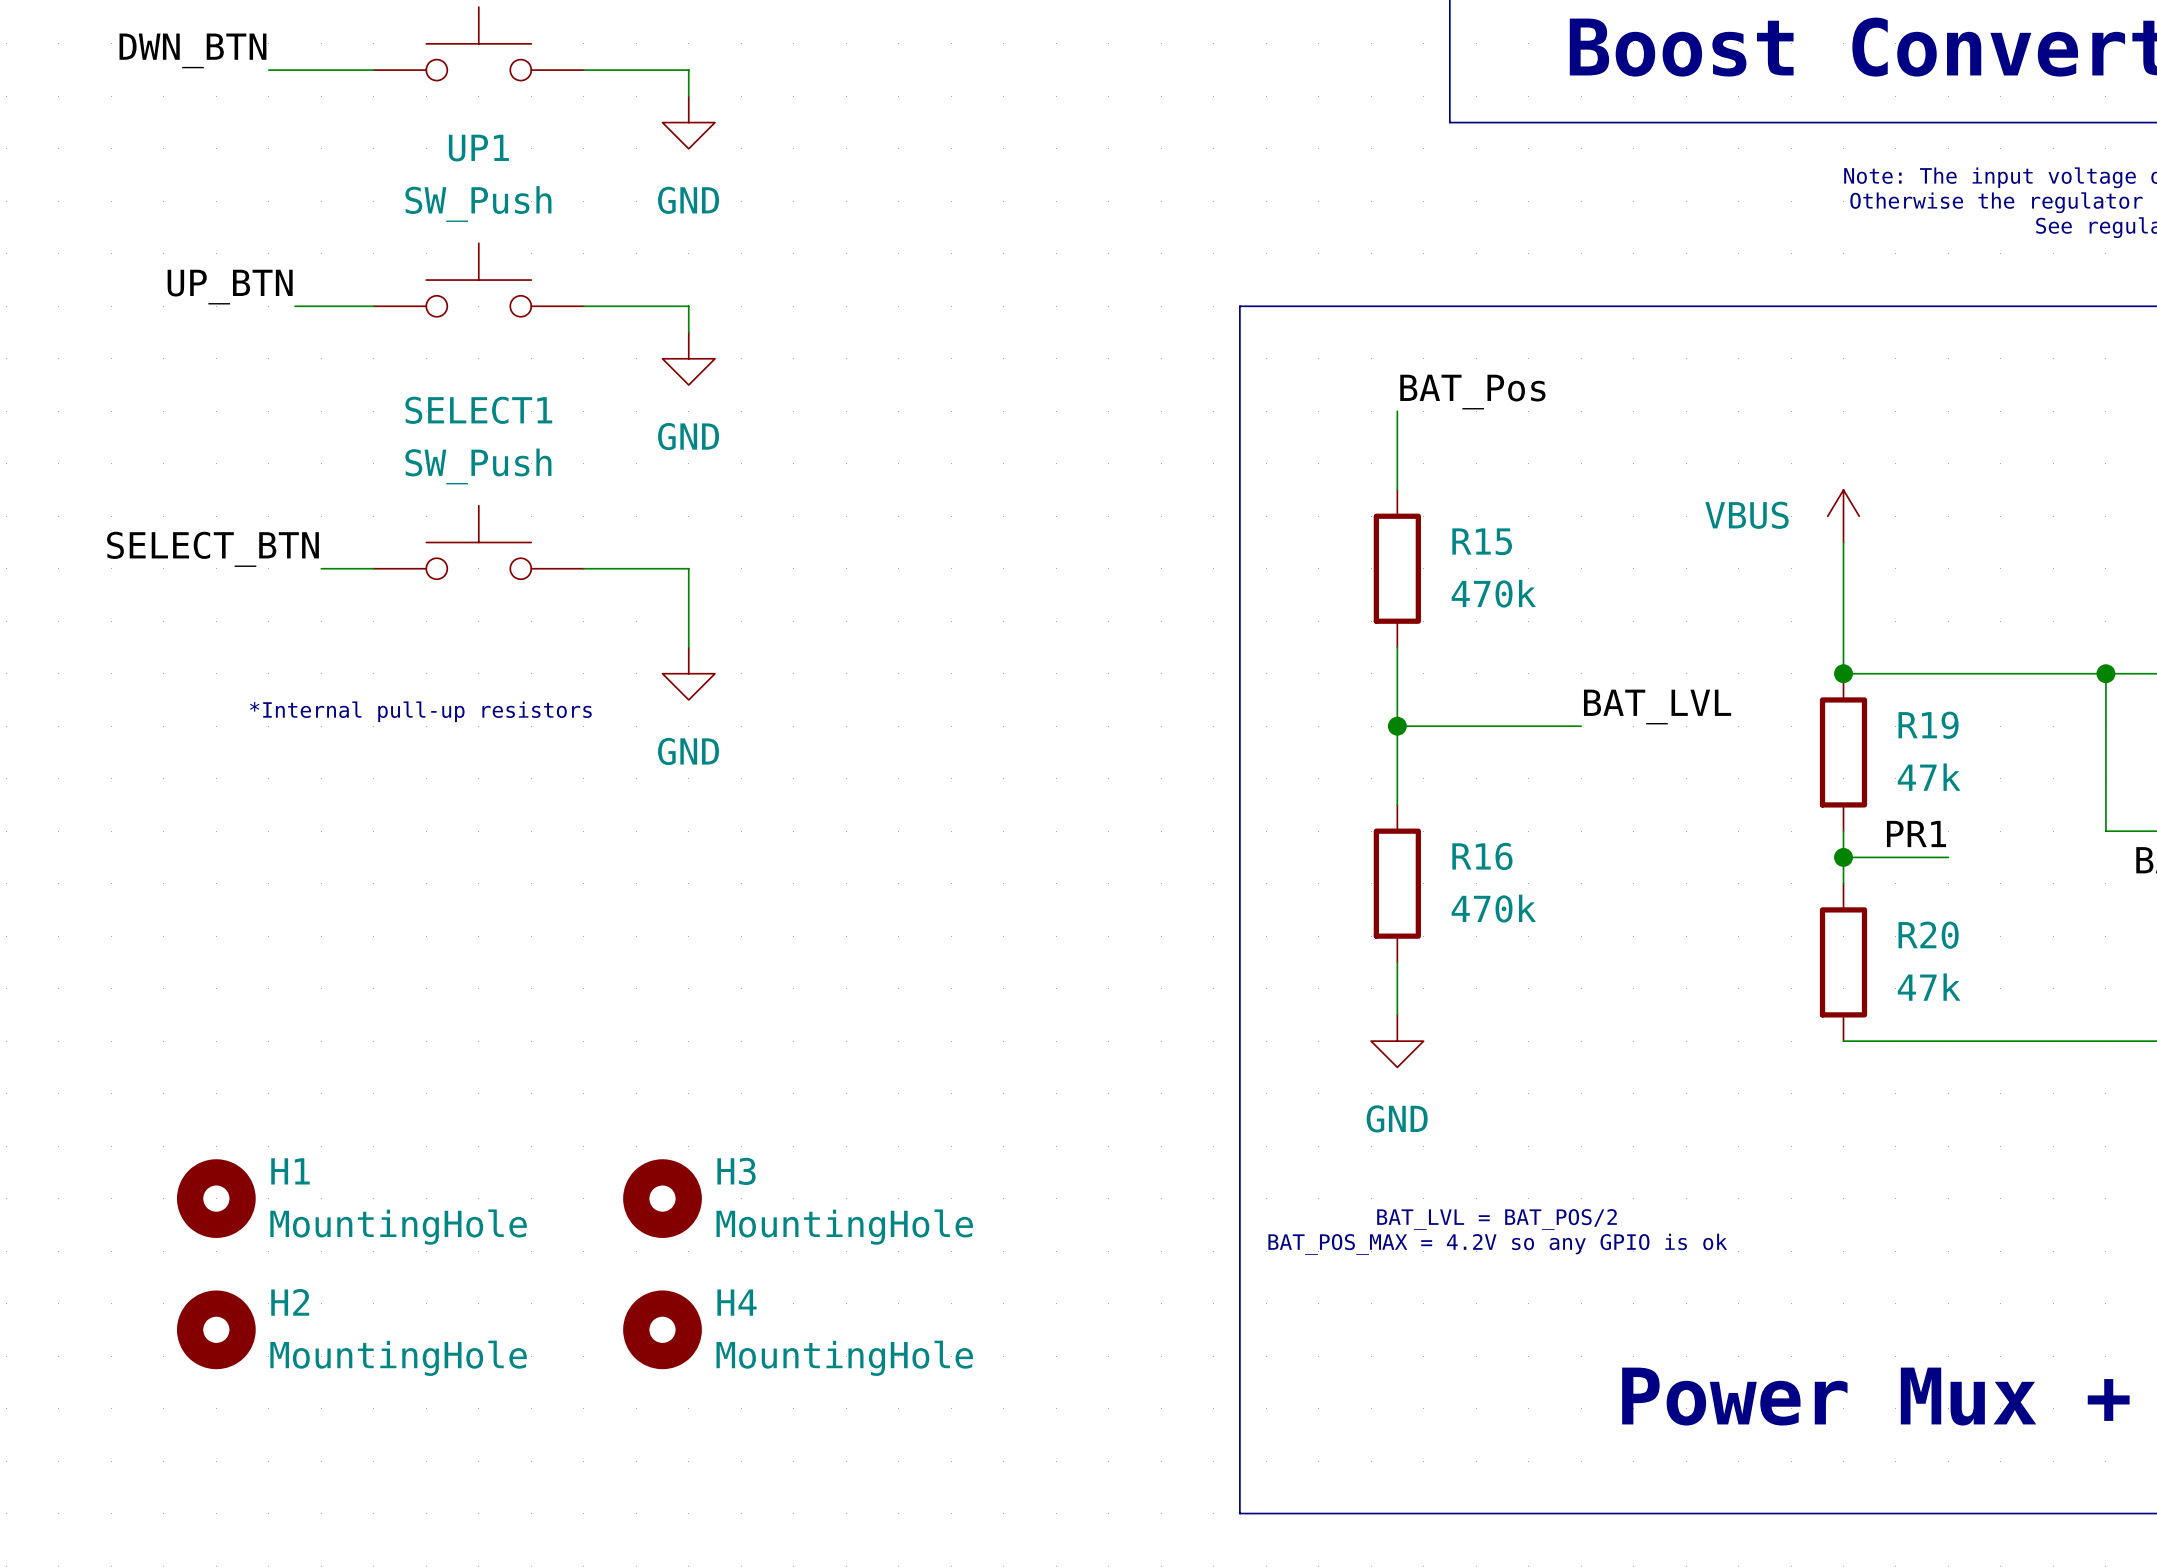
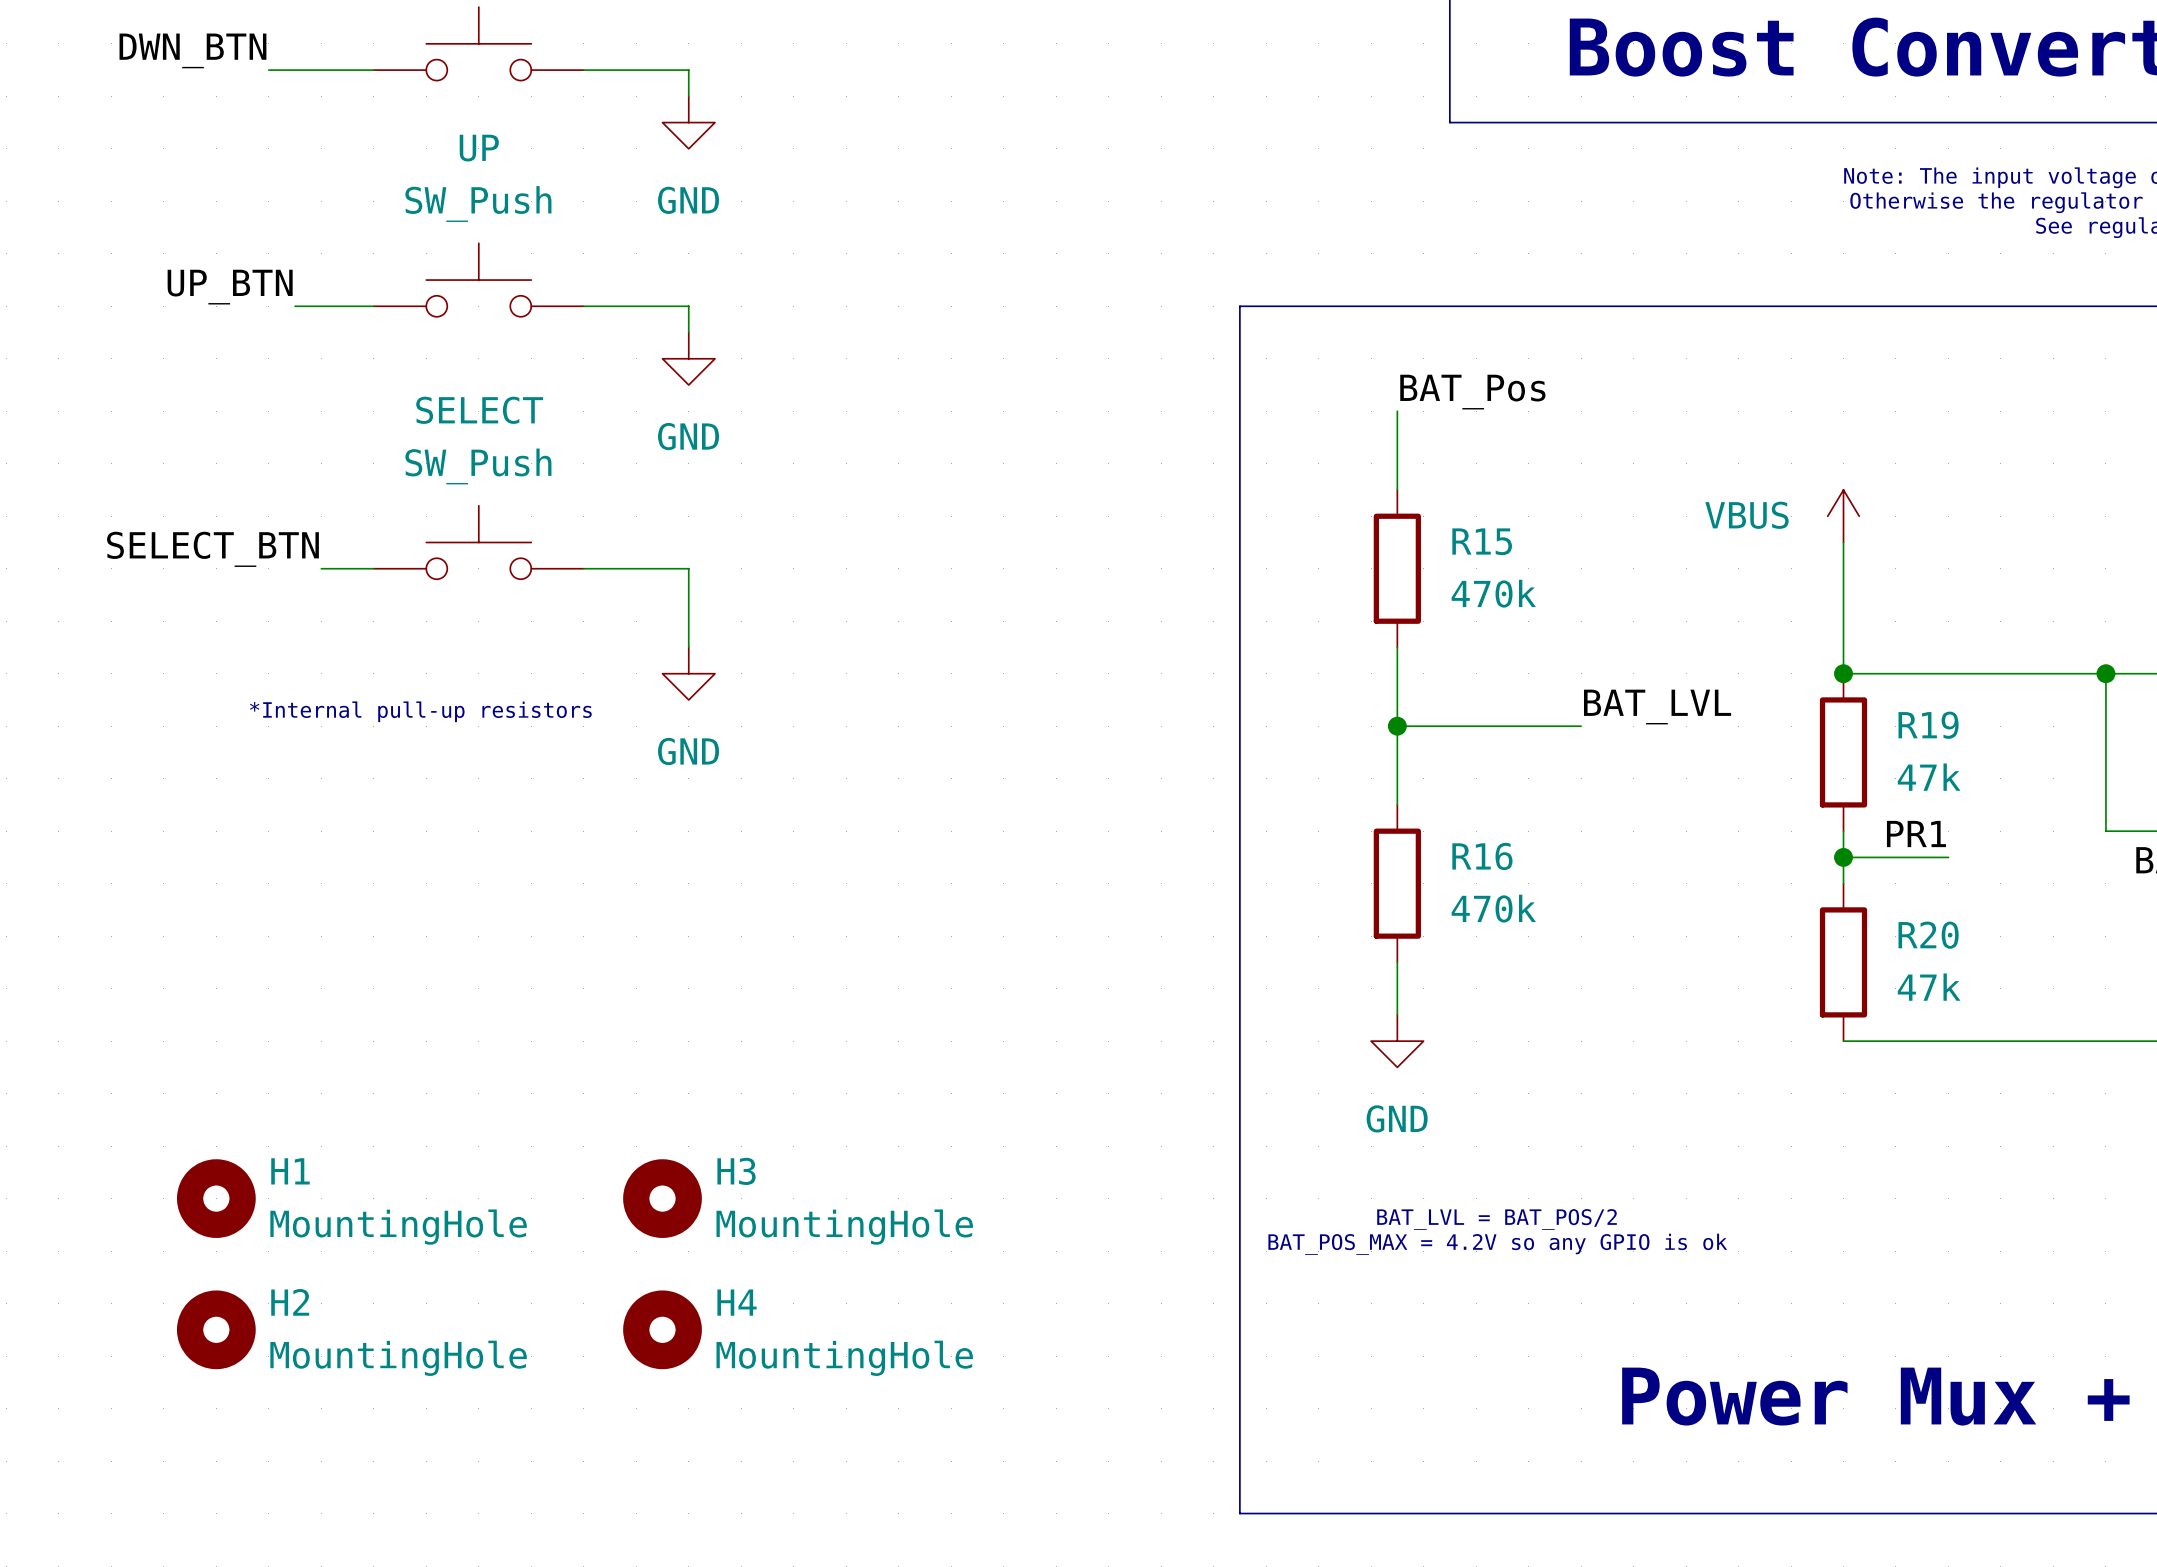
UP1 name: UP1 (478, 148) -> UP (479, 148)
SELECT1 name: SELECT1 (478, 410) -> SELECT (479, 410)

